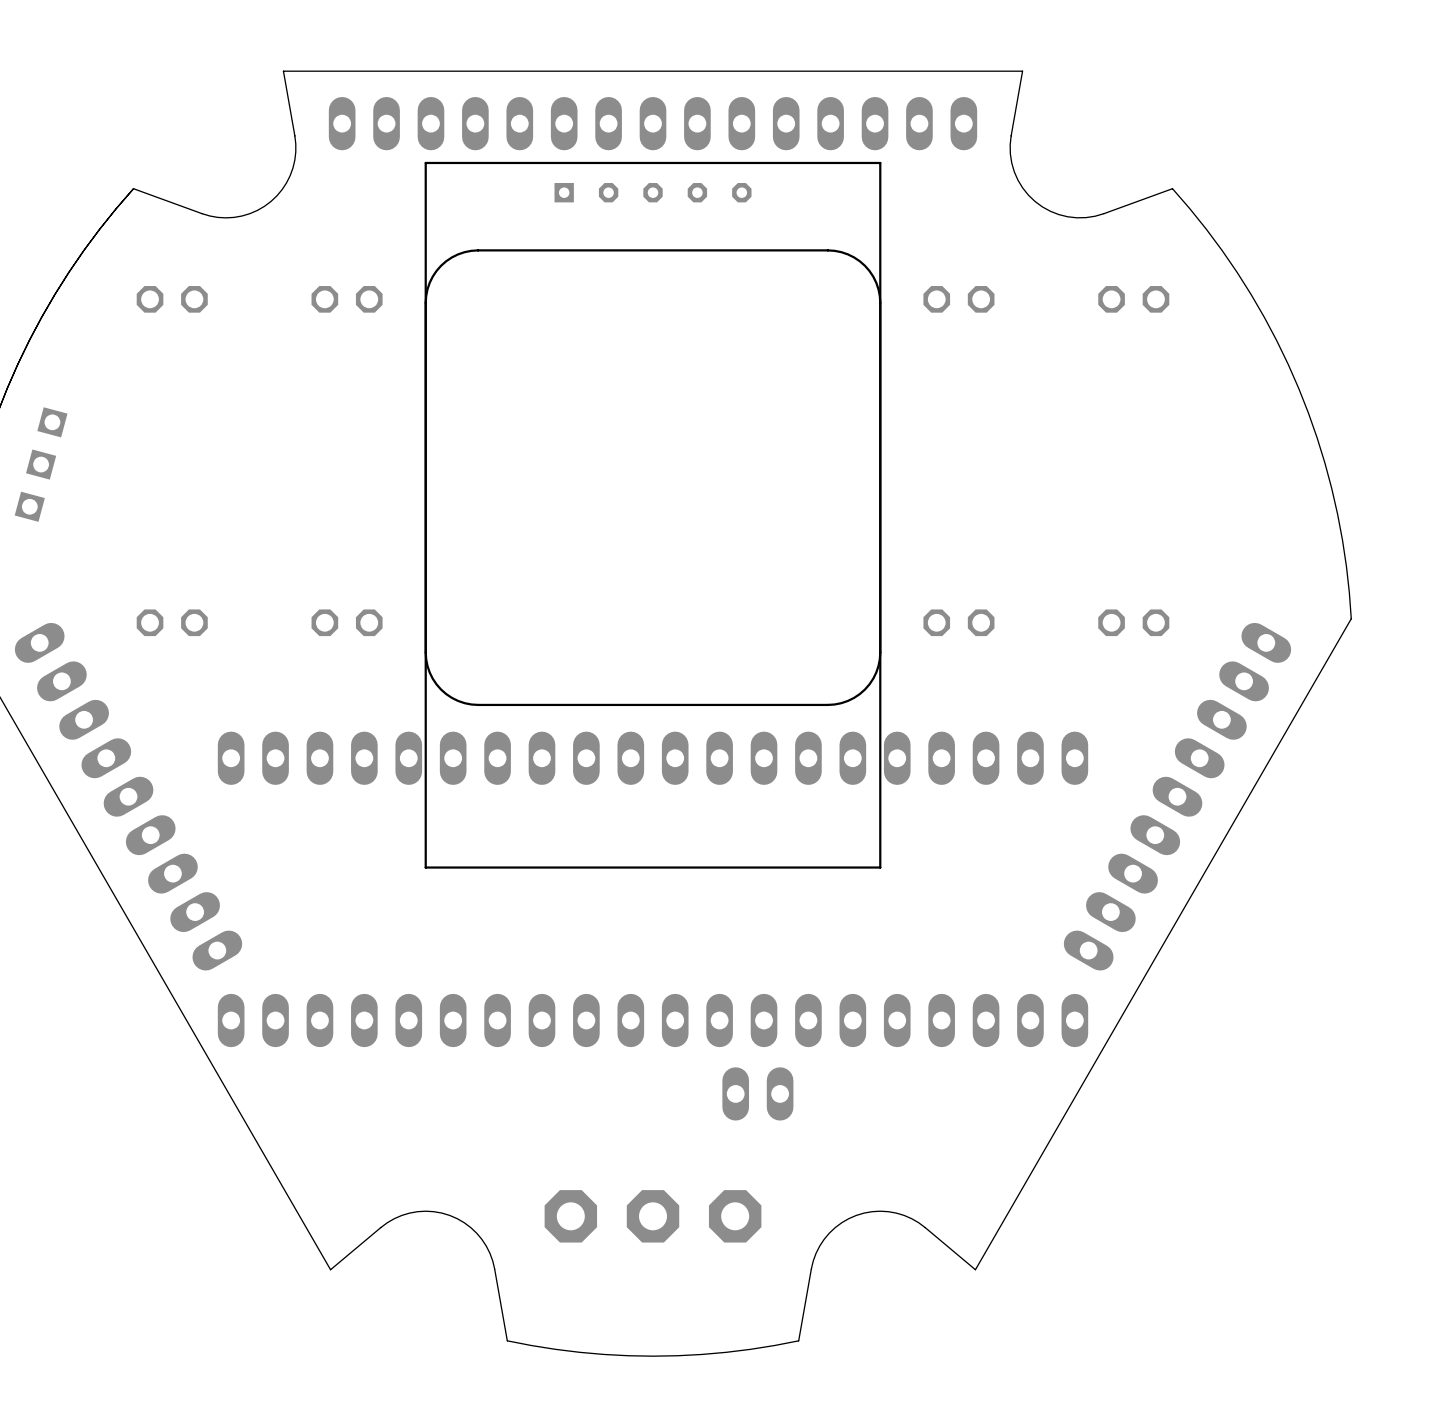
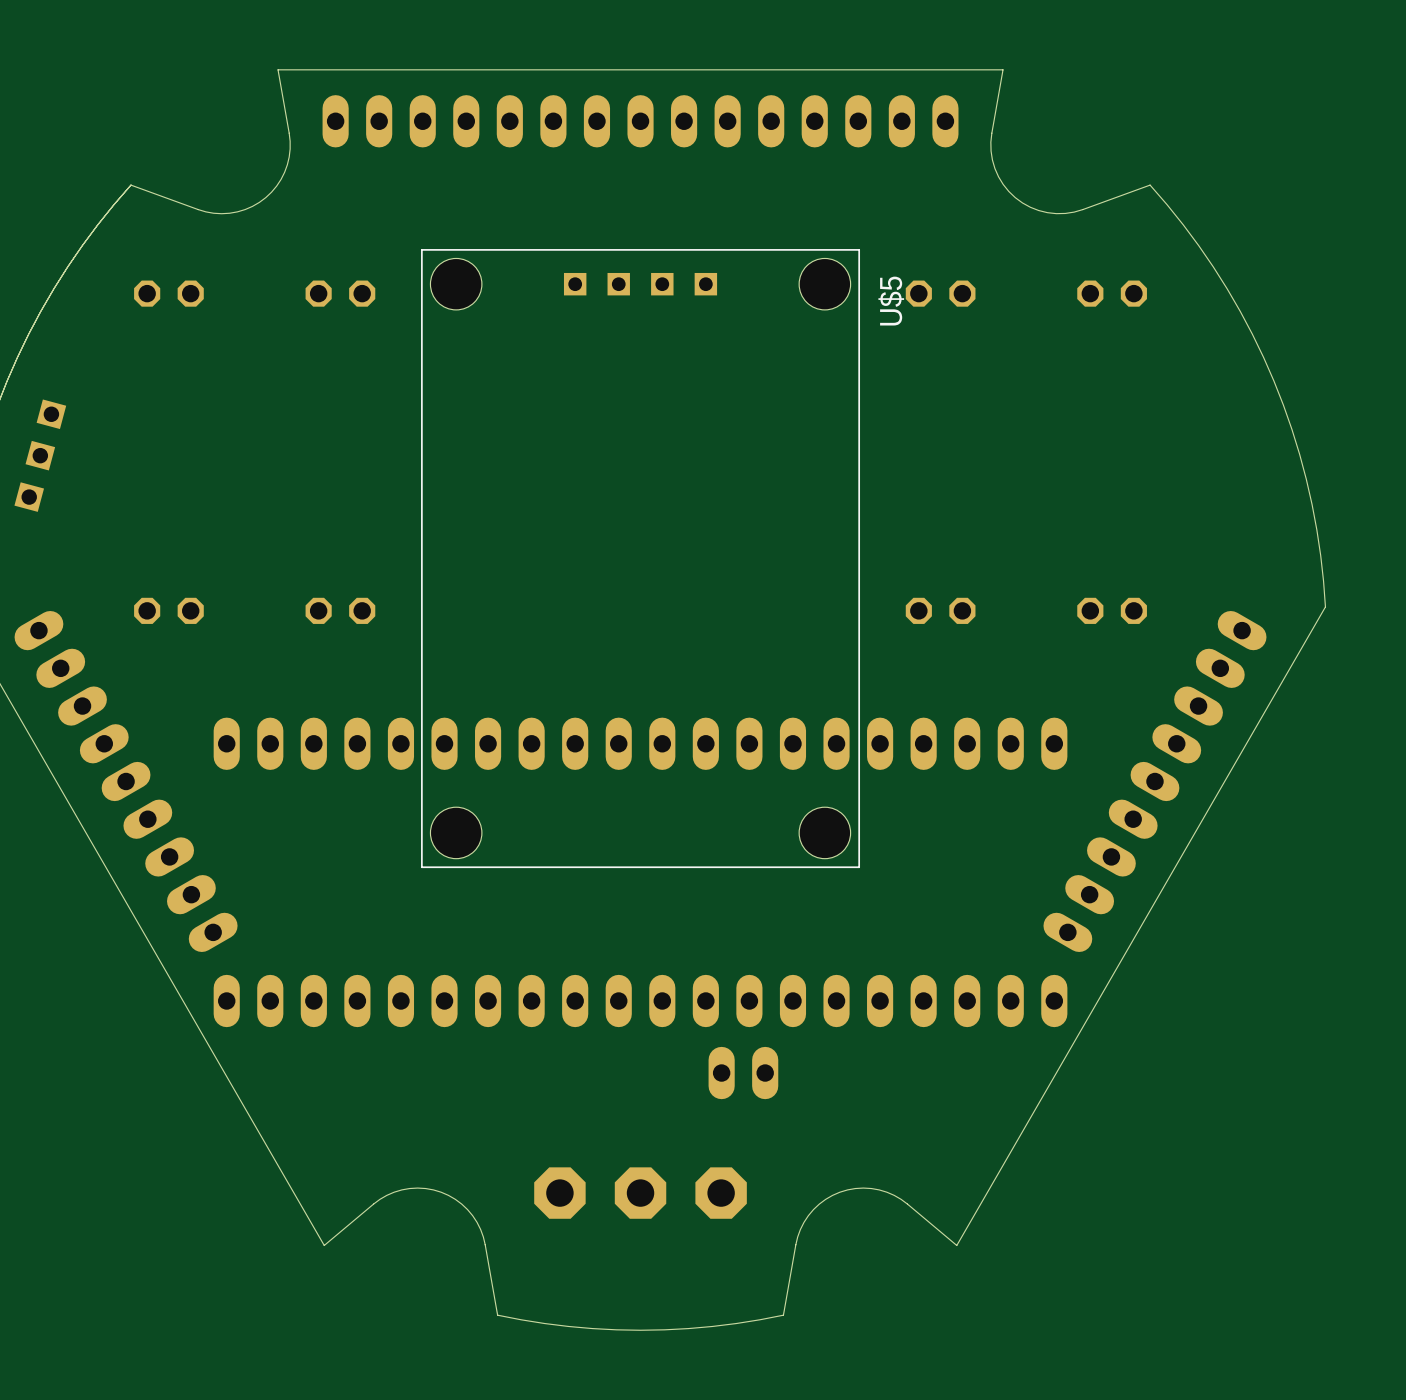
part: (653, 515) -> none
U$5: none -> (640, 558)

